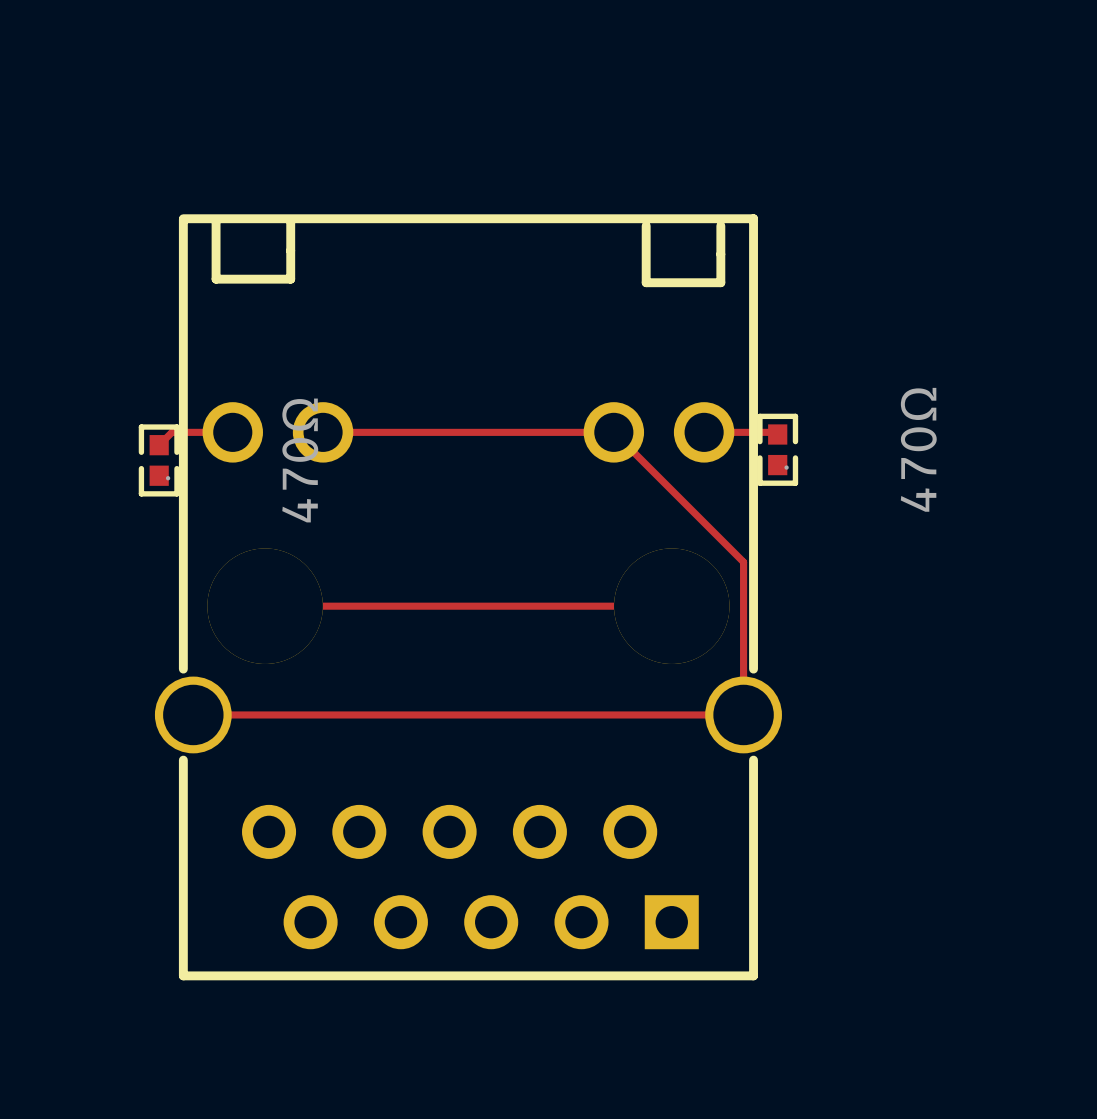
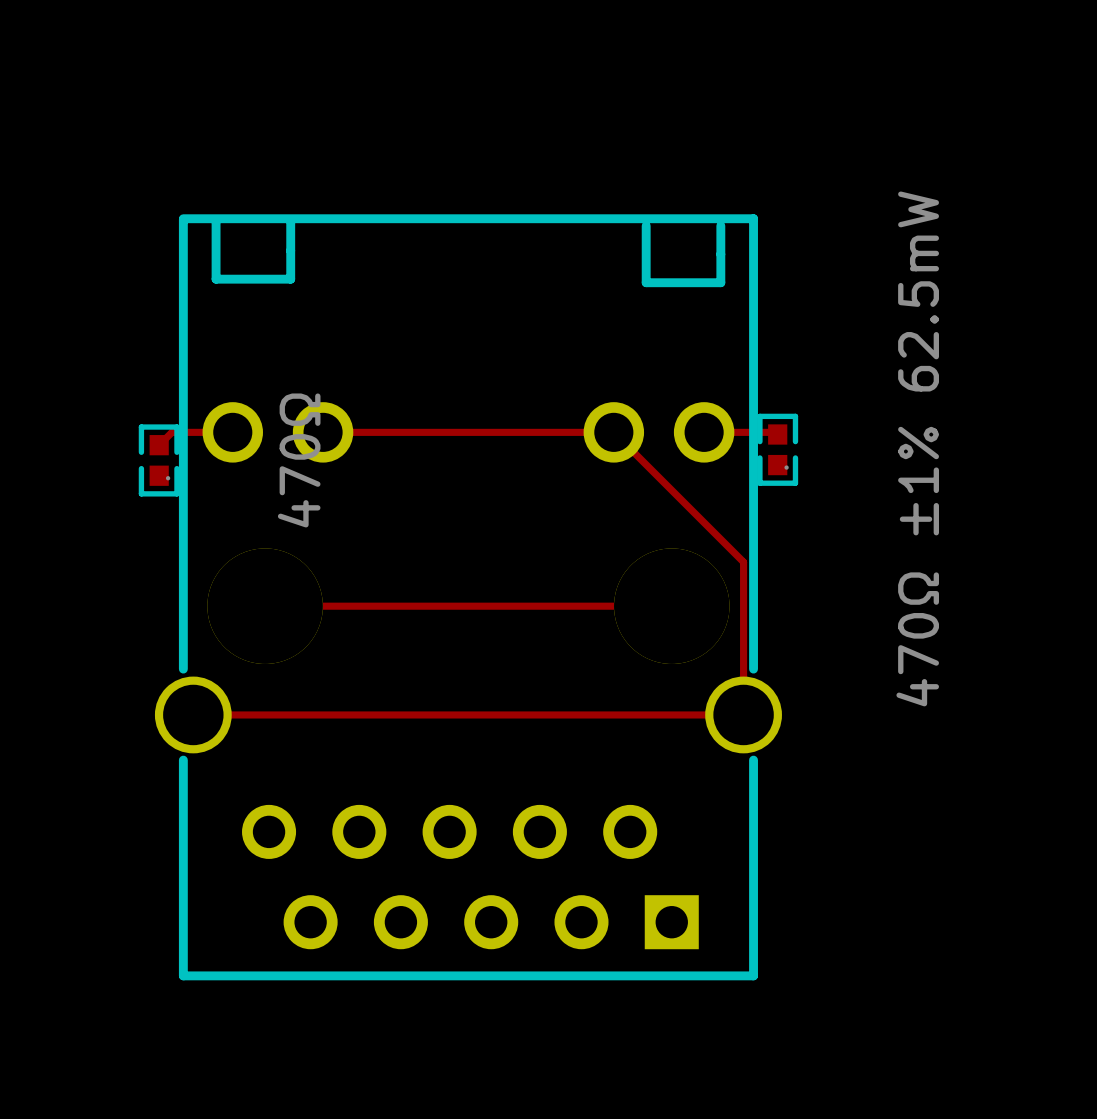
part value: 470Ω (918, 449) -> 470Ω ±1% 62.5mW (917, 448)

